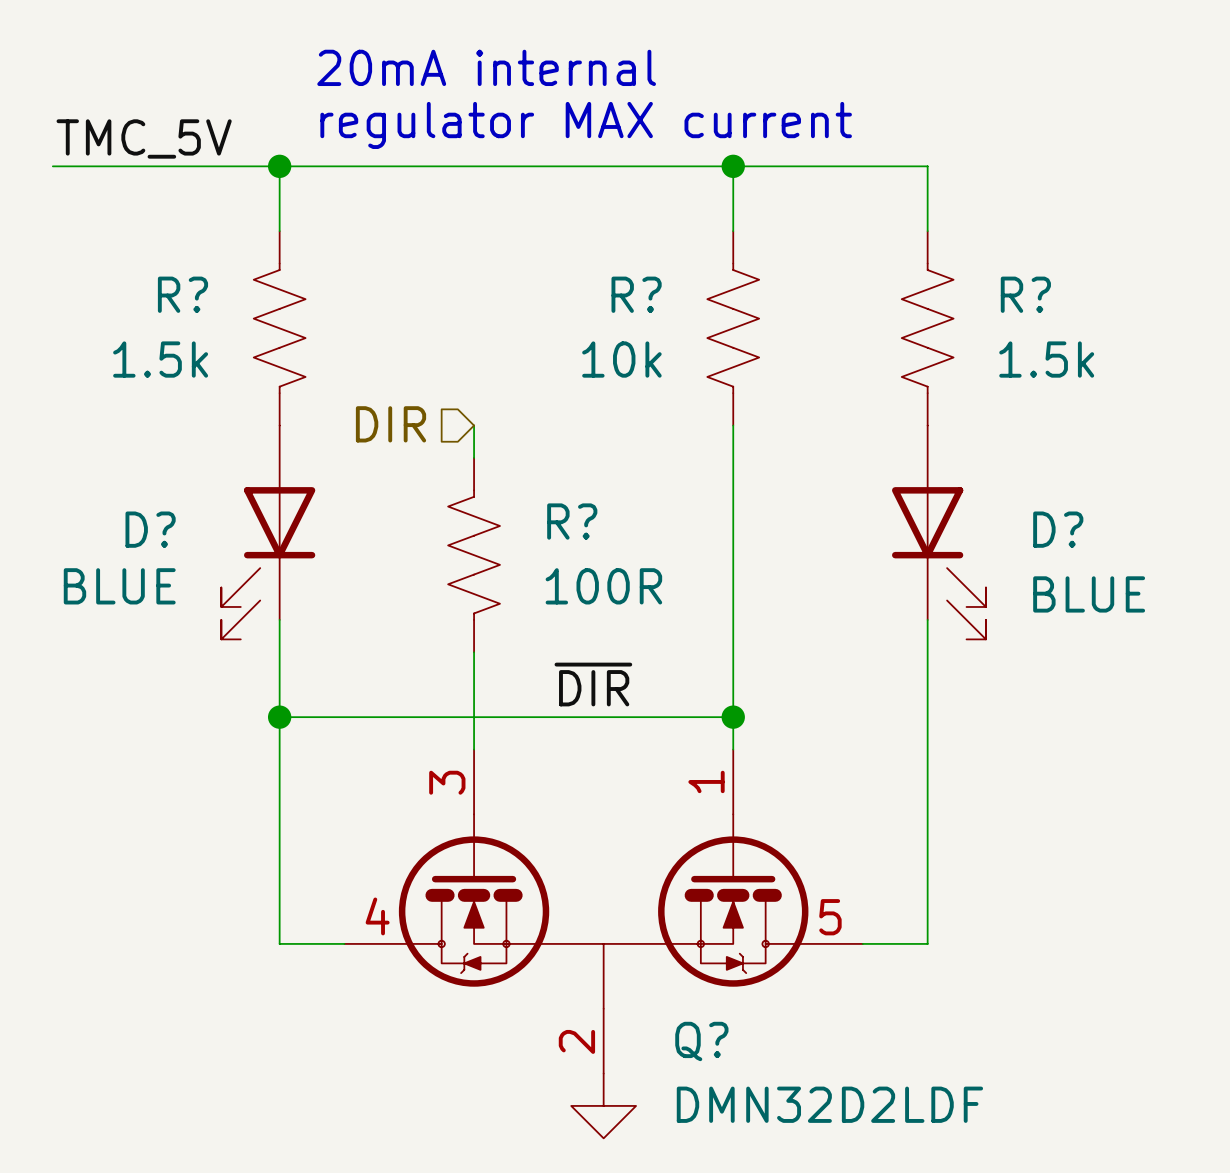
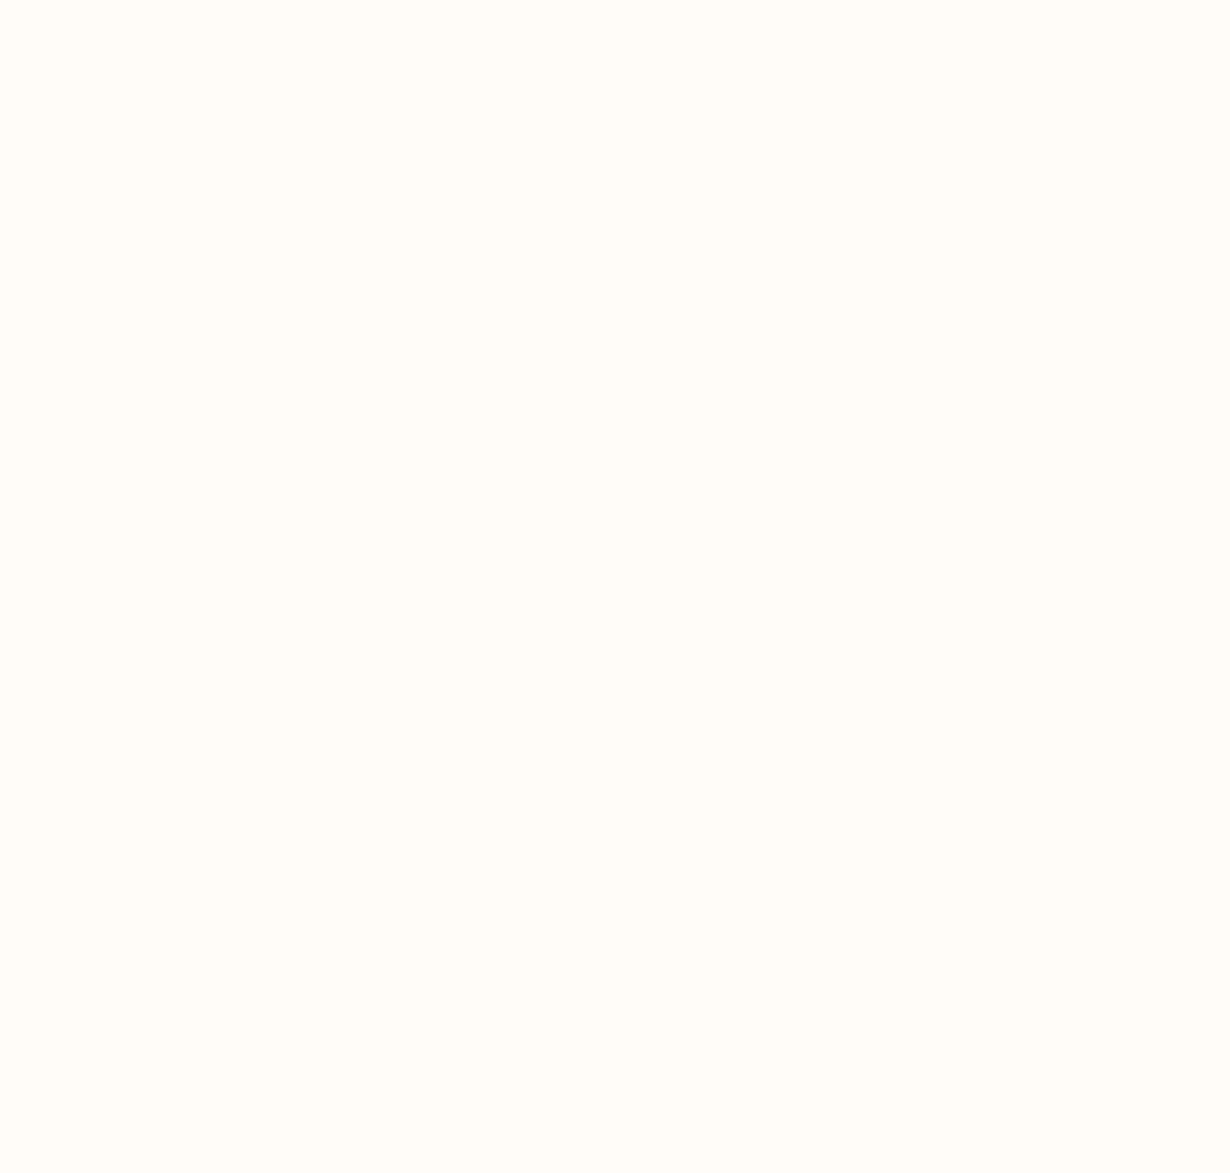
text: 20mA internal (486, 67) -> none
text: regulator MAX current (586, 125) -> none
label: TMC_5V (144, 138) -> none
wire: (52, 166) (927, 166) (927, 231) -> none
wire: (279, 166) (279, 231) -> none
junction: (279, 166) -> none
wire: (733, 166) (733, 231) -> none
junction: (733, 166) -> none
R?: 1.5k (279, 328) -> none
R?: 10k (733, 328) -> none
R?: 1.5k (927, 328) -> none
hierarchical label: DIR (391, 424) -> none
wire: (474, 425) (474, 457) -> none
wire: (733, 425) (733, 749) -> none
D?: BLUE (268, 532) -> none
D?: BLUE (938, 532) -> none
R?: 100R (474, 555) -> none
wire: (279, 619) (279, 943) (344, 943) -> none
wire: (927, 619) (927, 943) (862, 943) -> none
wire: (474, 652) (474, 749) -> none
label: ~{DIR} (593, 684) -> none
wire: (279, 717) (733, 717) -> none
junction: (279, 717) -> none
junction: (733, 717) -> none
Q?: DMN32D2LDF (603, 911) -> none
power symbol: (603, 1105) -> none

